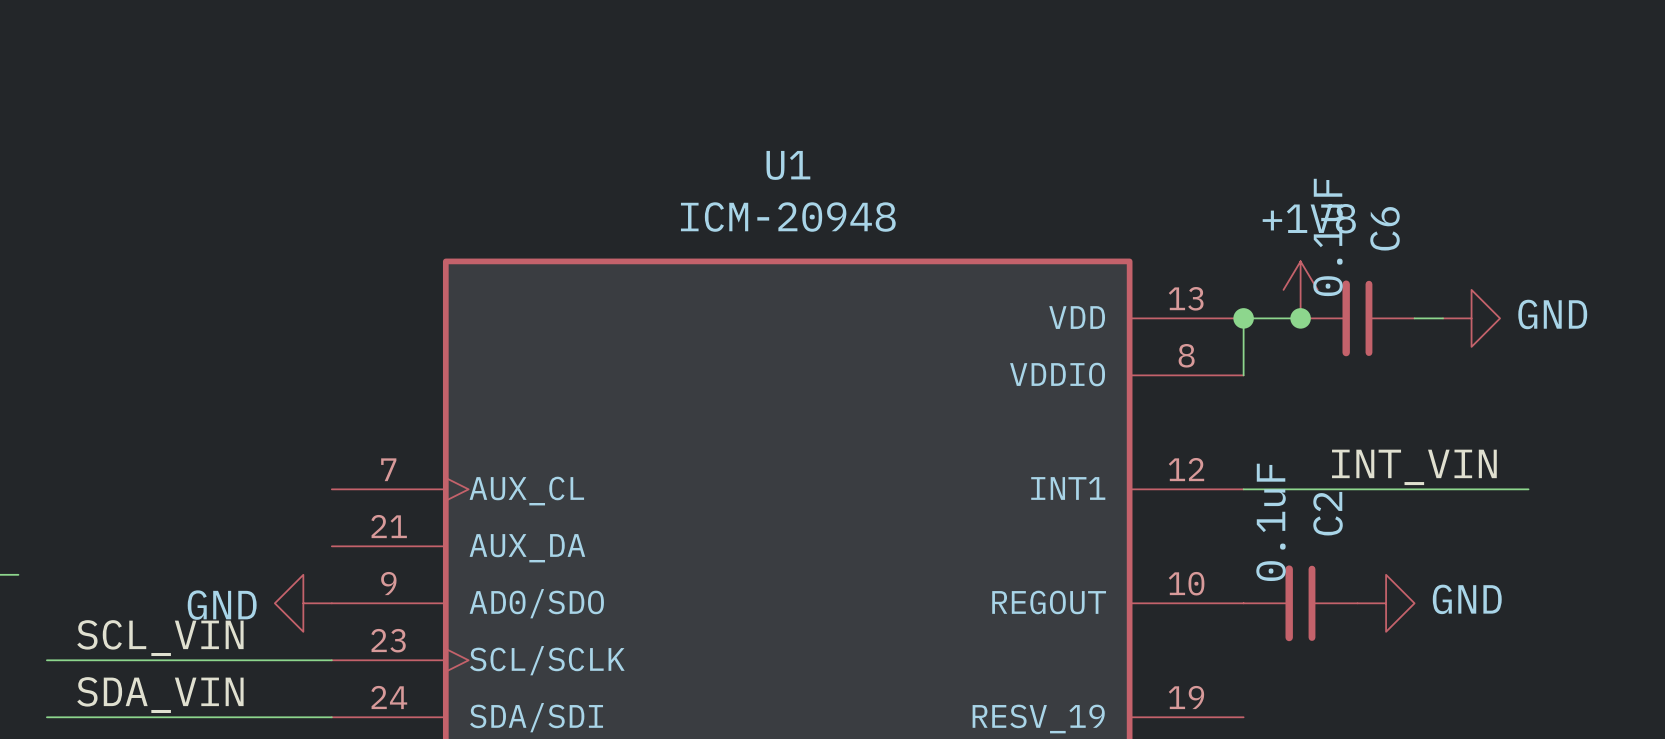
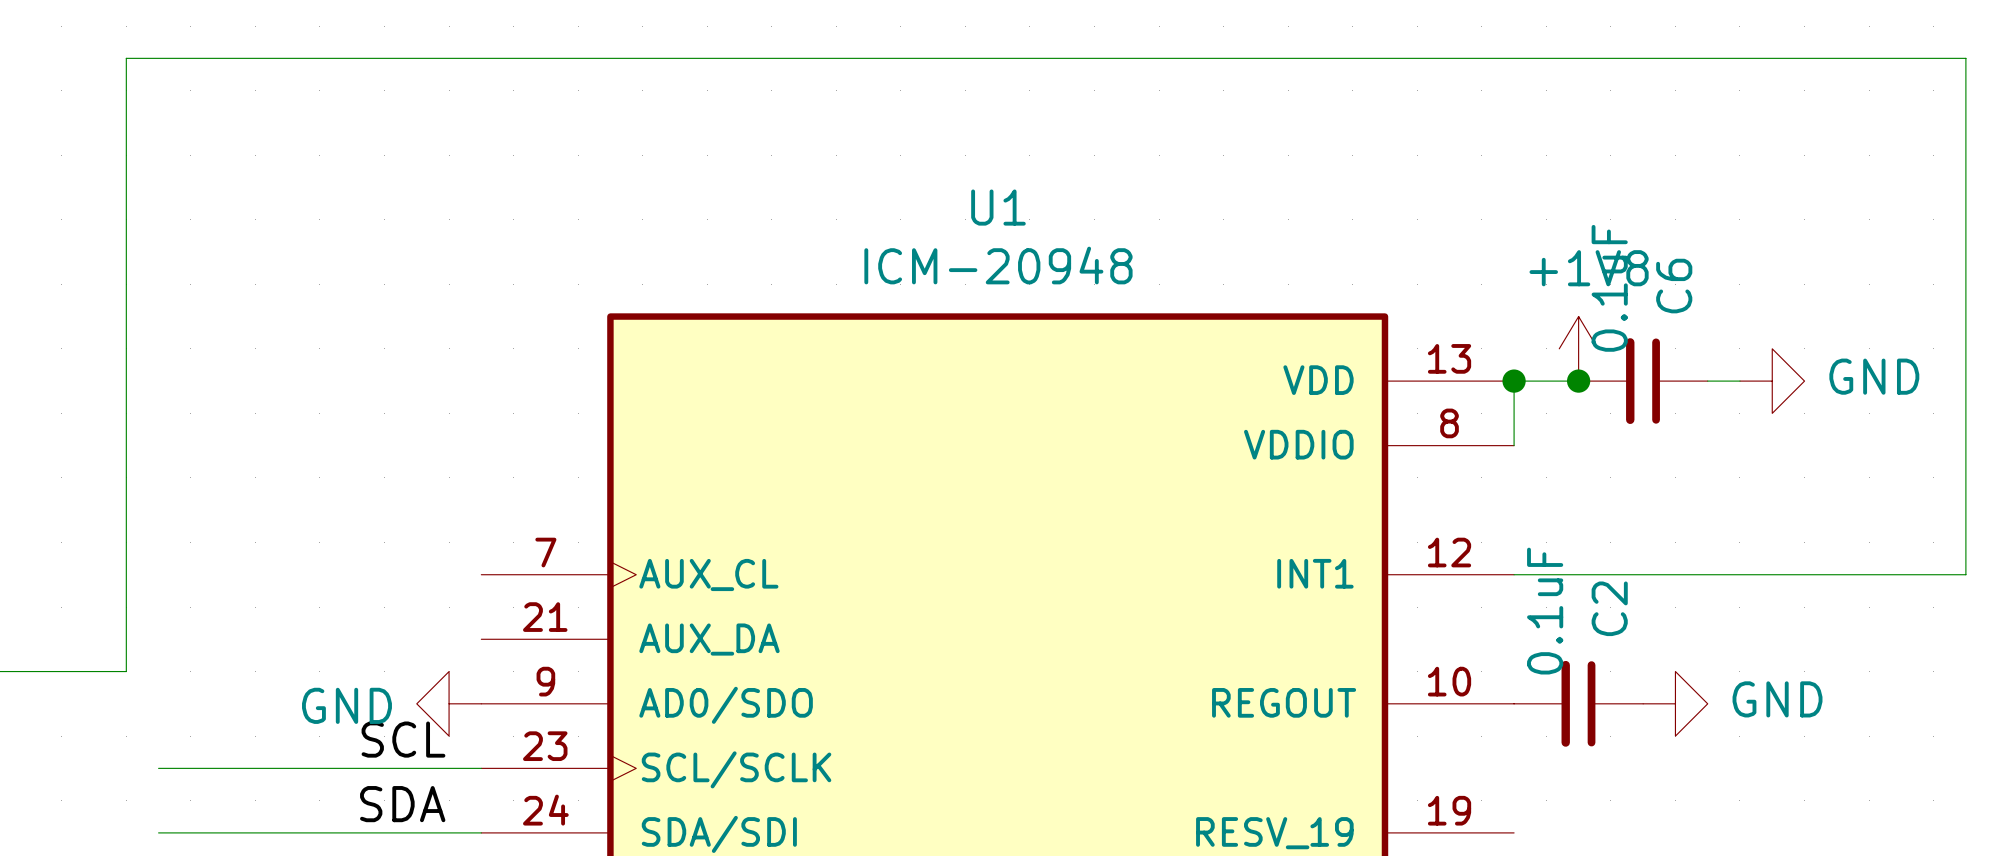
label: INT_VIN (1414, 467) -> none
wire: none -> (1836, 574) (1965, 574) (1965, 58) (126, 58) (126, 671)
label: none -> SCL (403, 739)
label: SCL_VIN (160, 638) -> none
label: none -> SDA (402, 804)
label: SDA_VIN (160, 695) -> none

